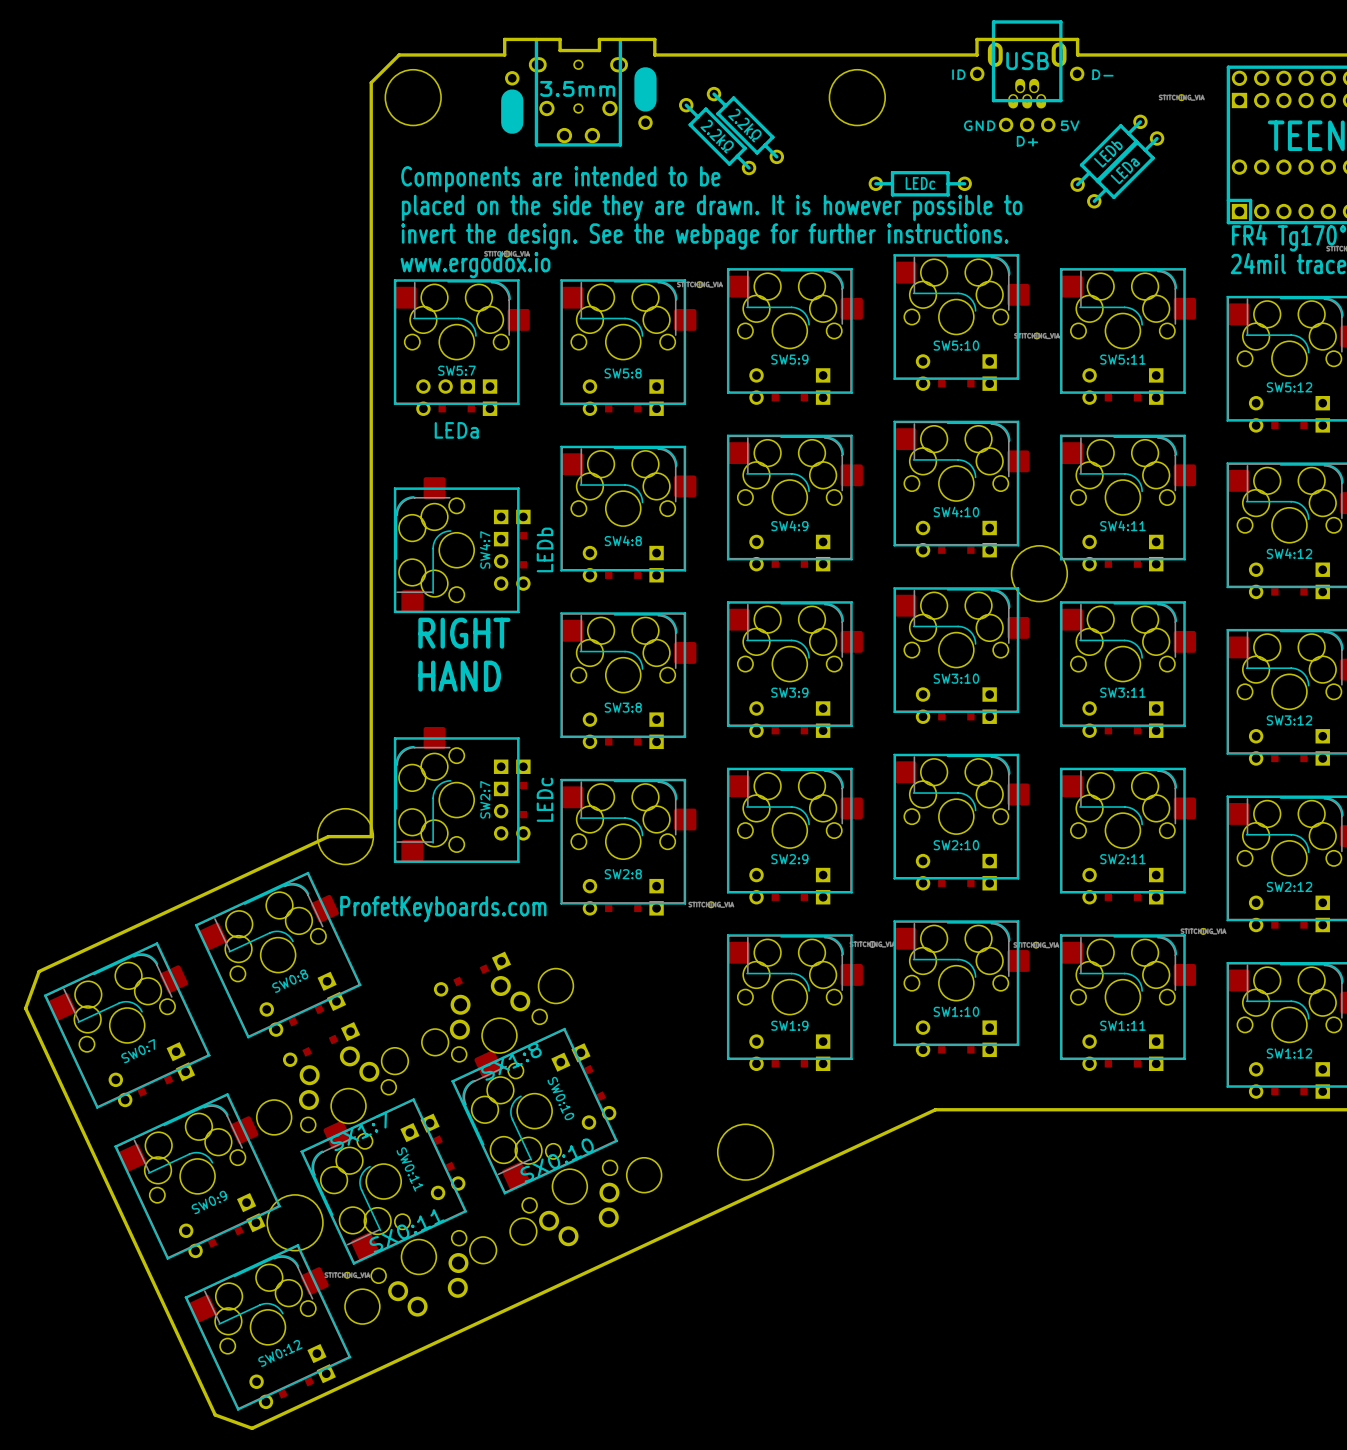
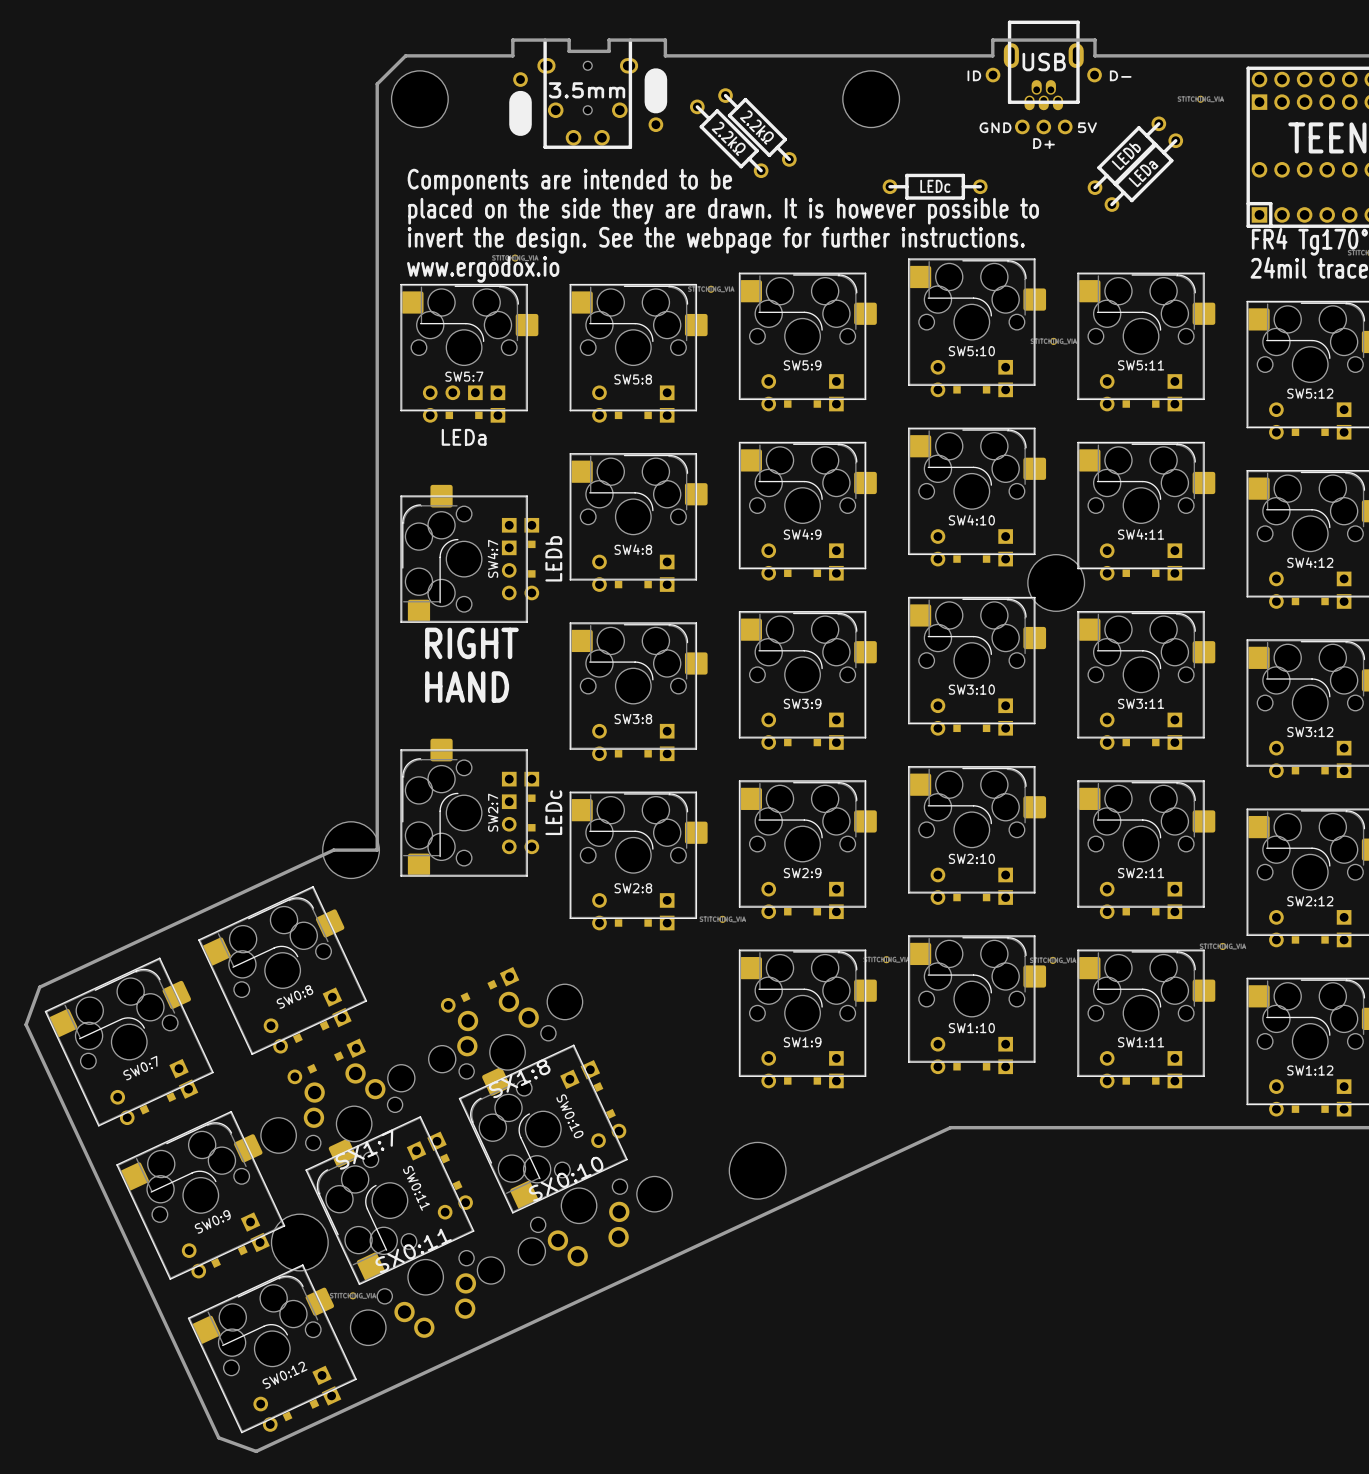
text: ProfetKeyboards.com (443, 909) -> none

